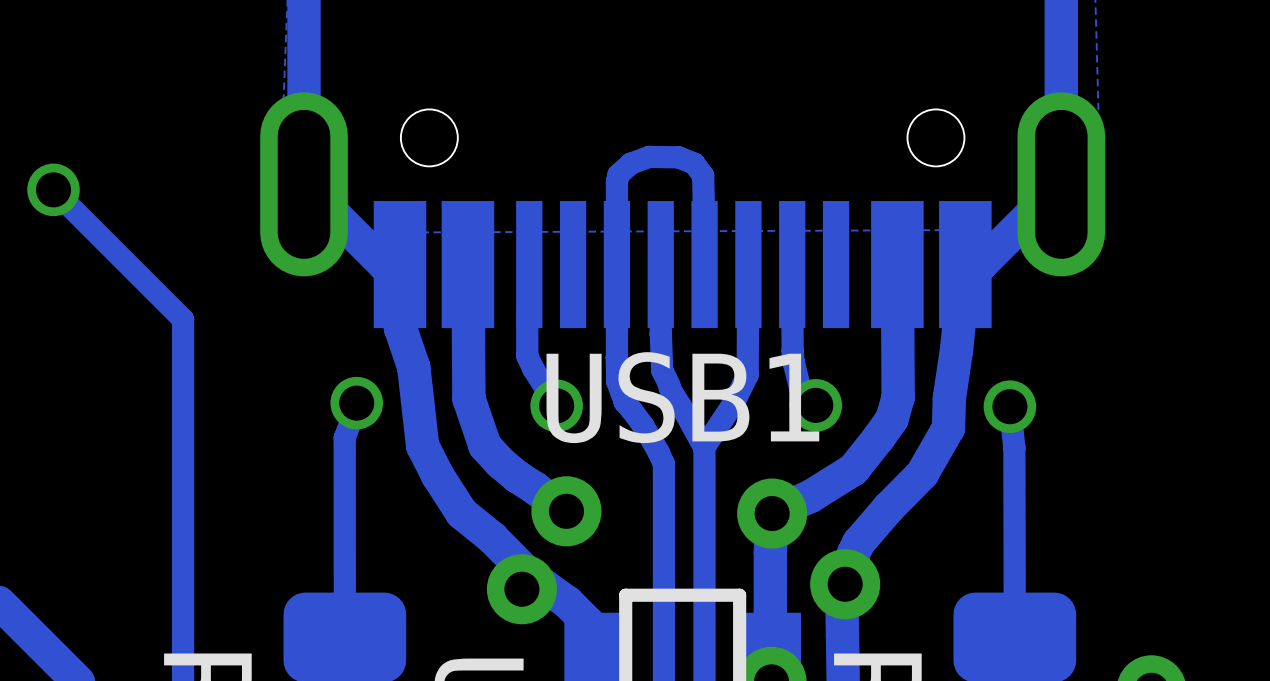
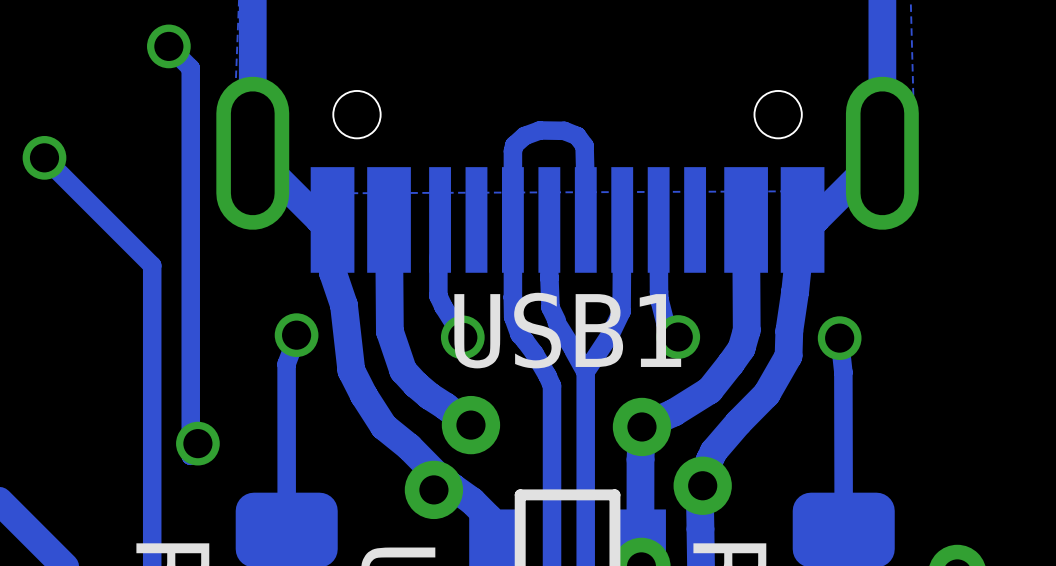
track: none -> (168, 46) (190, 68) (190, 455)
via: none -> (168, 46)
via: none -> (197, 443)

